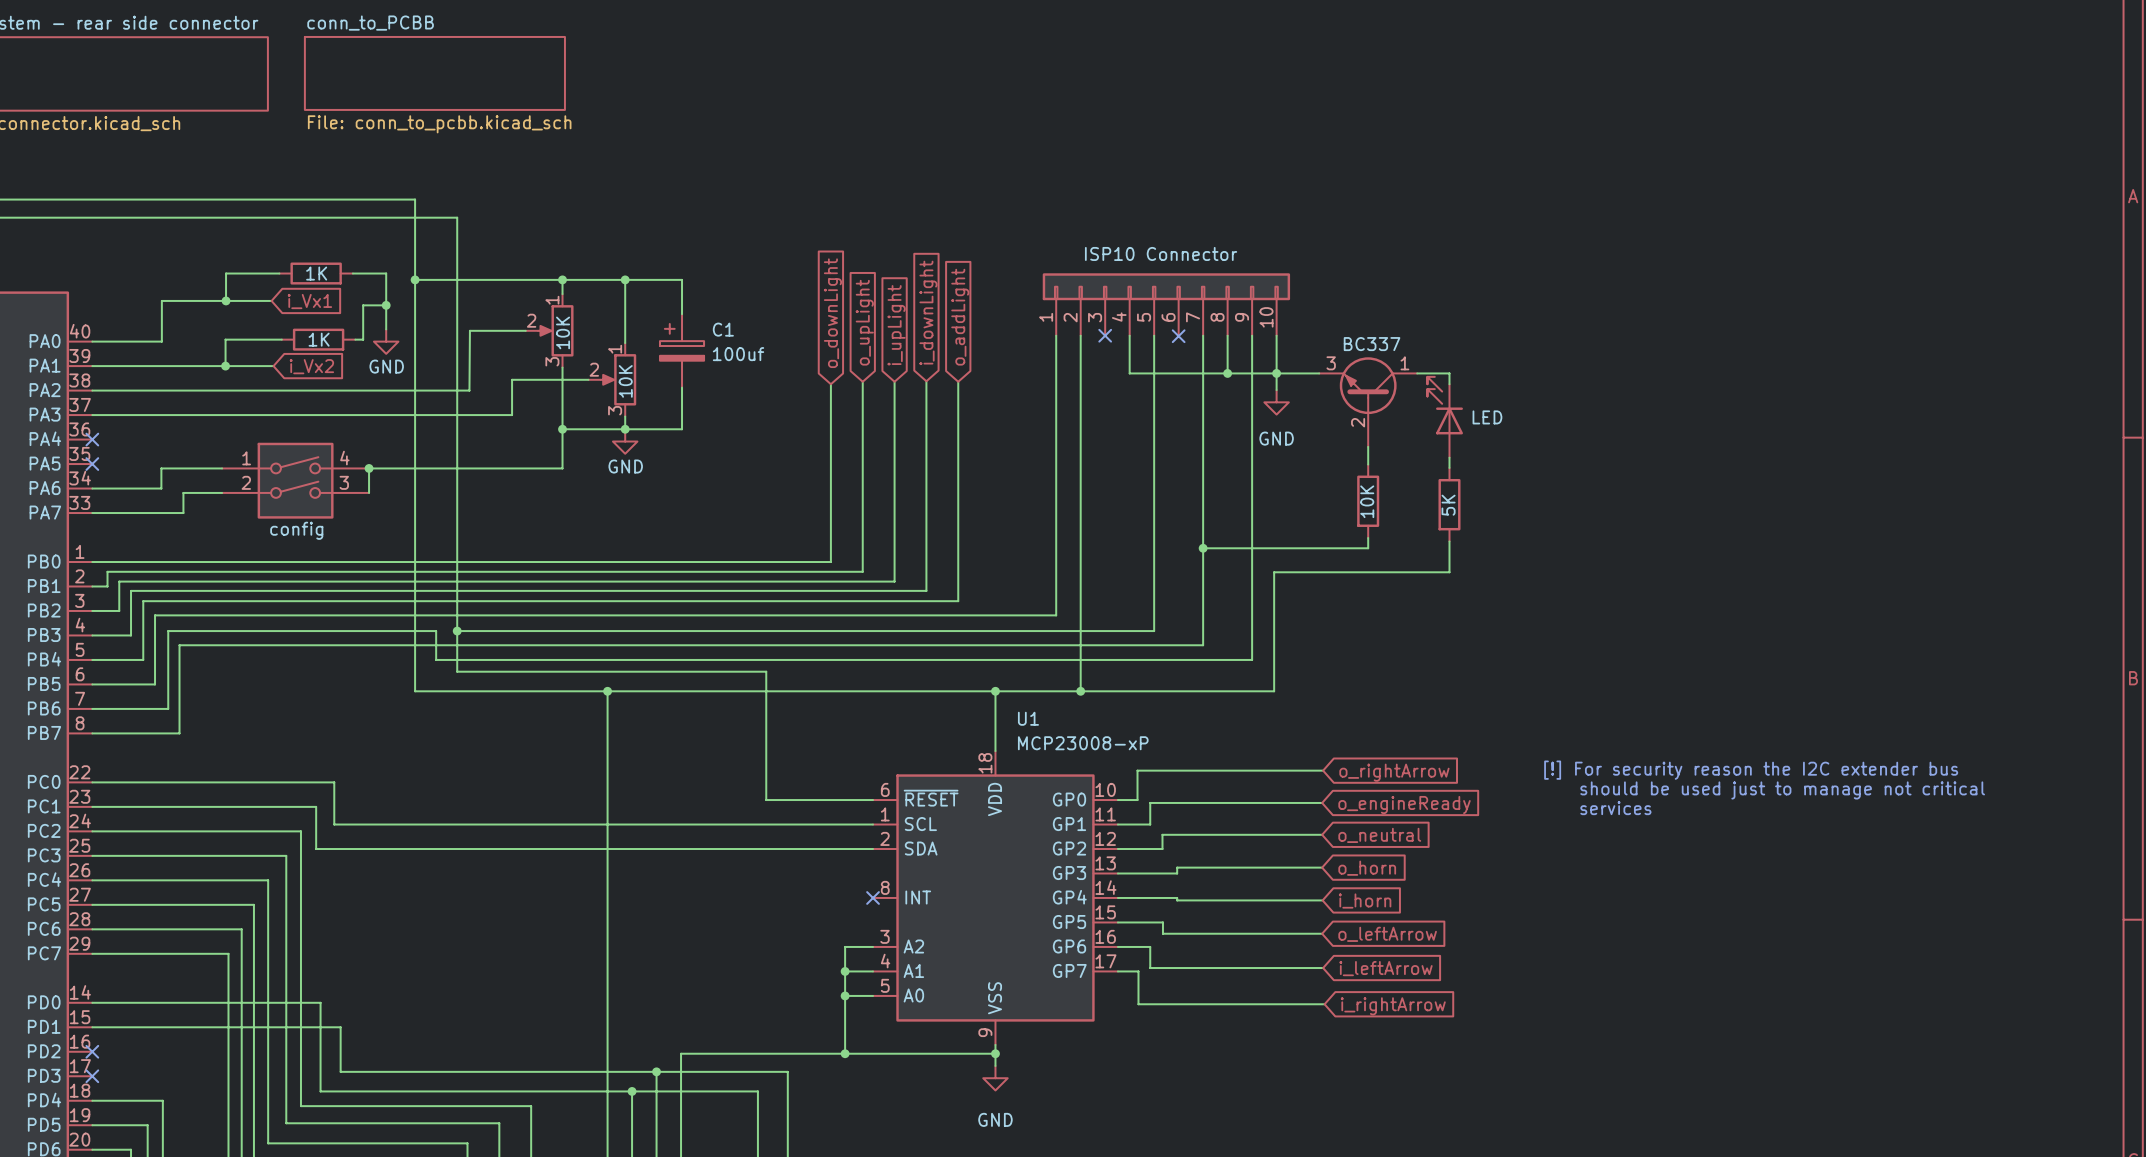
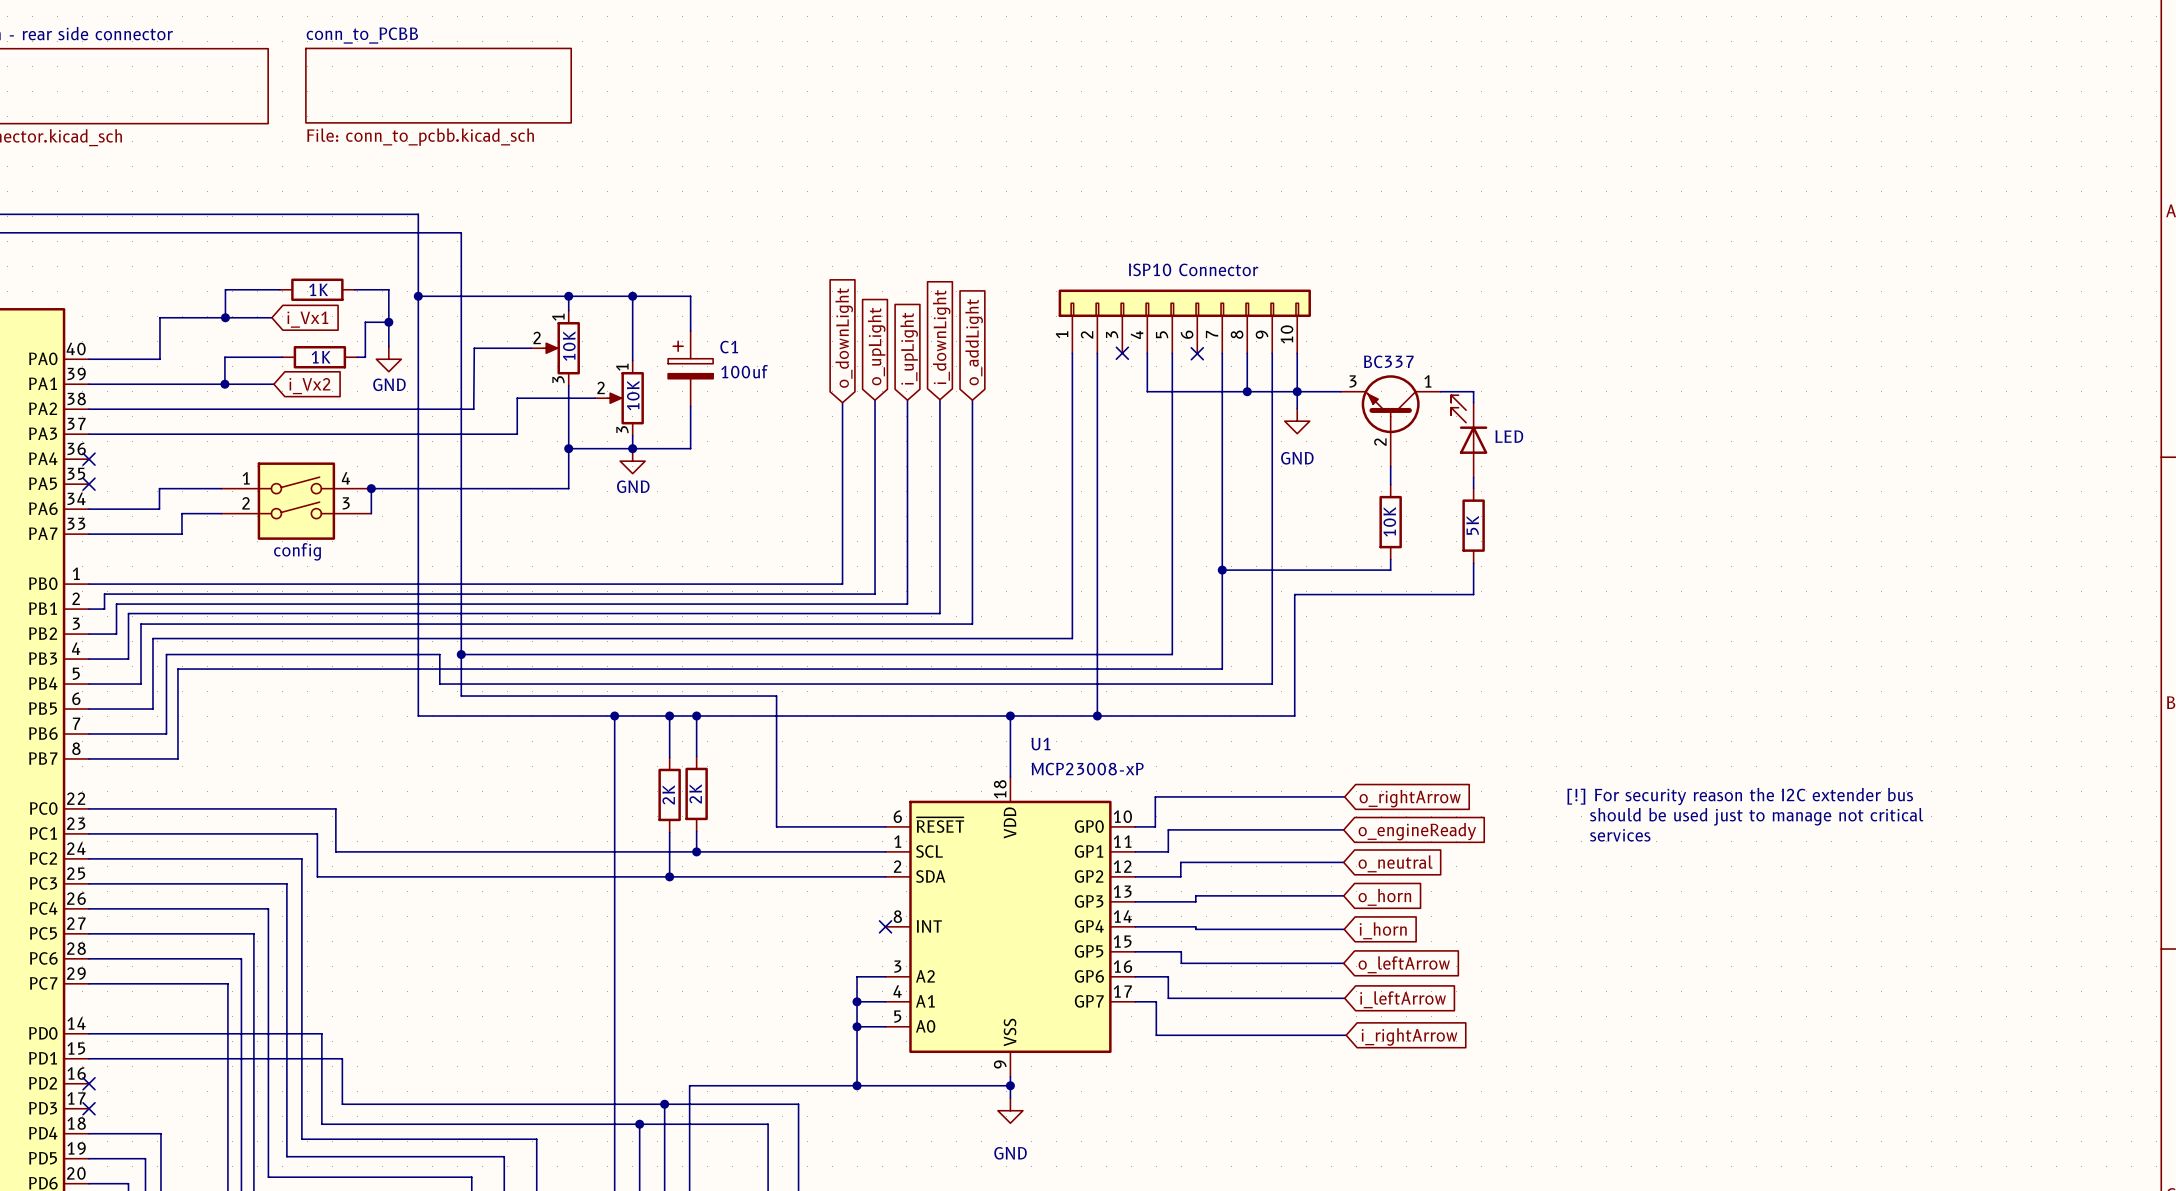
wire: none -> (669, 716) (669, 757)
junction: none -> (669, 716)
wire: none -> (696, 716) (696, 756)
junction: none -> (696, 716)
part: none -> 2K (696, 793)
part: none -> 2K (669, 794)
wire: none -> (696, 831) (696, 851)
wire: none -> (669, 832) (669, 876)
junction: none -> (696, 851)
junction: none -> (669, 876)

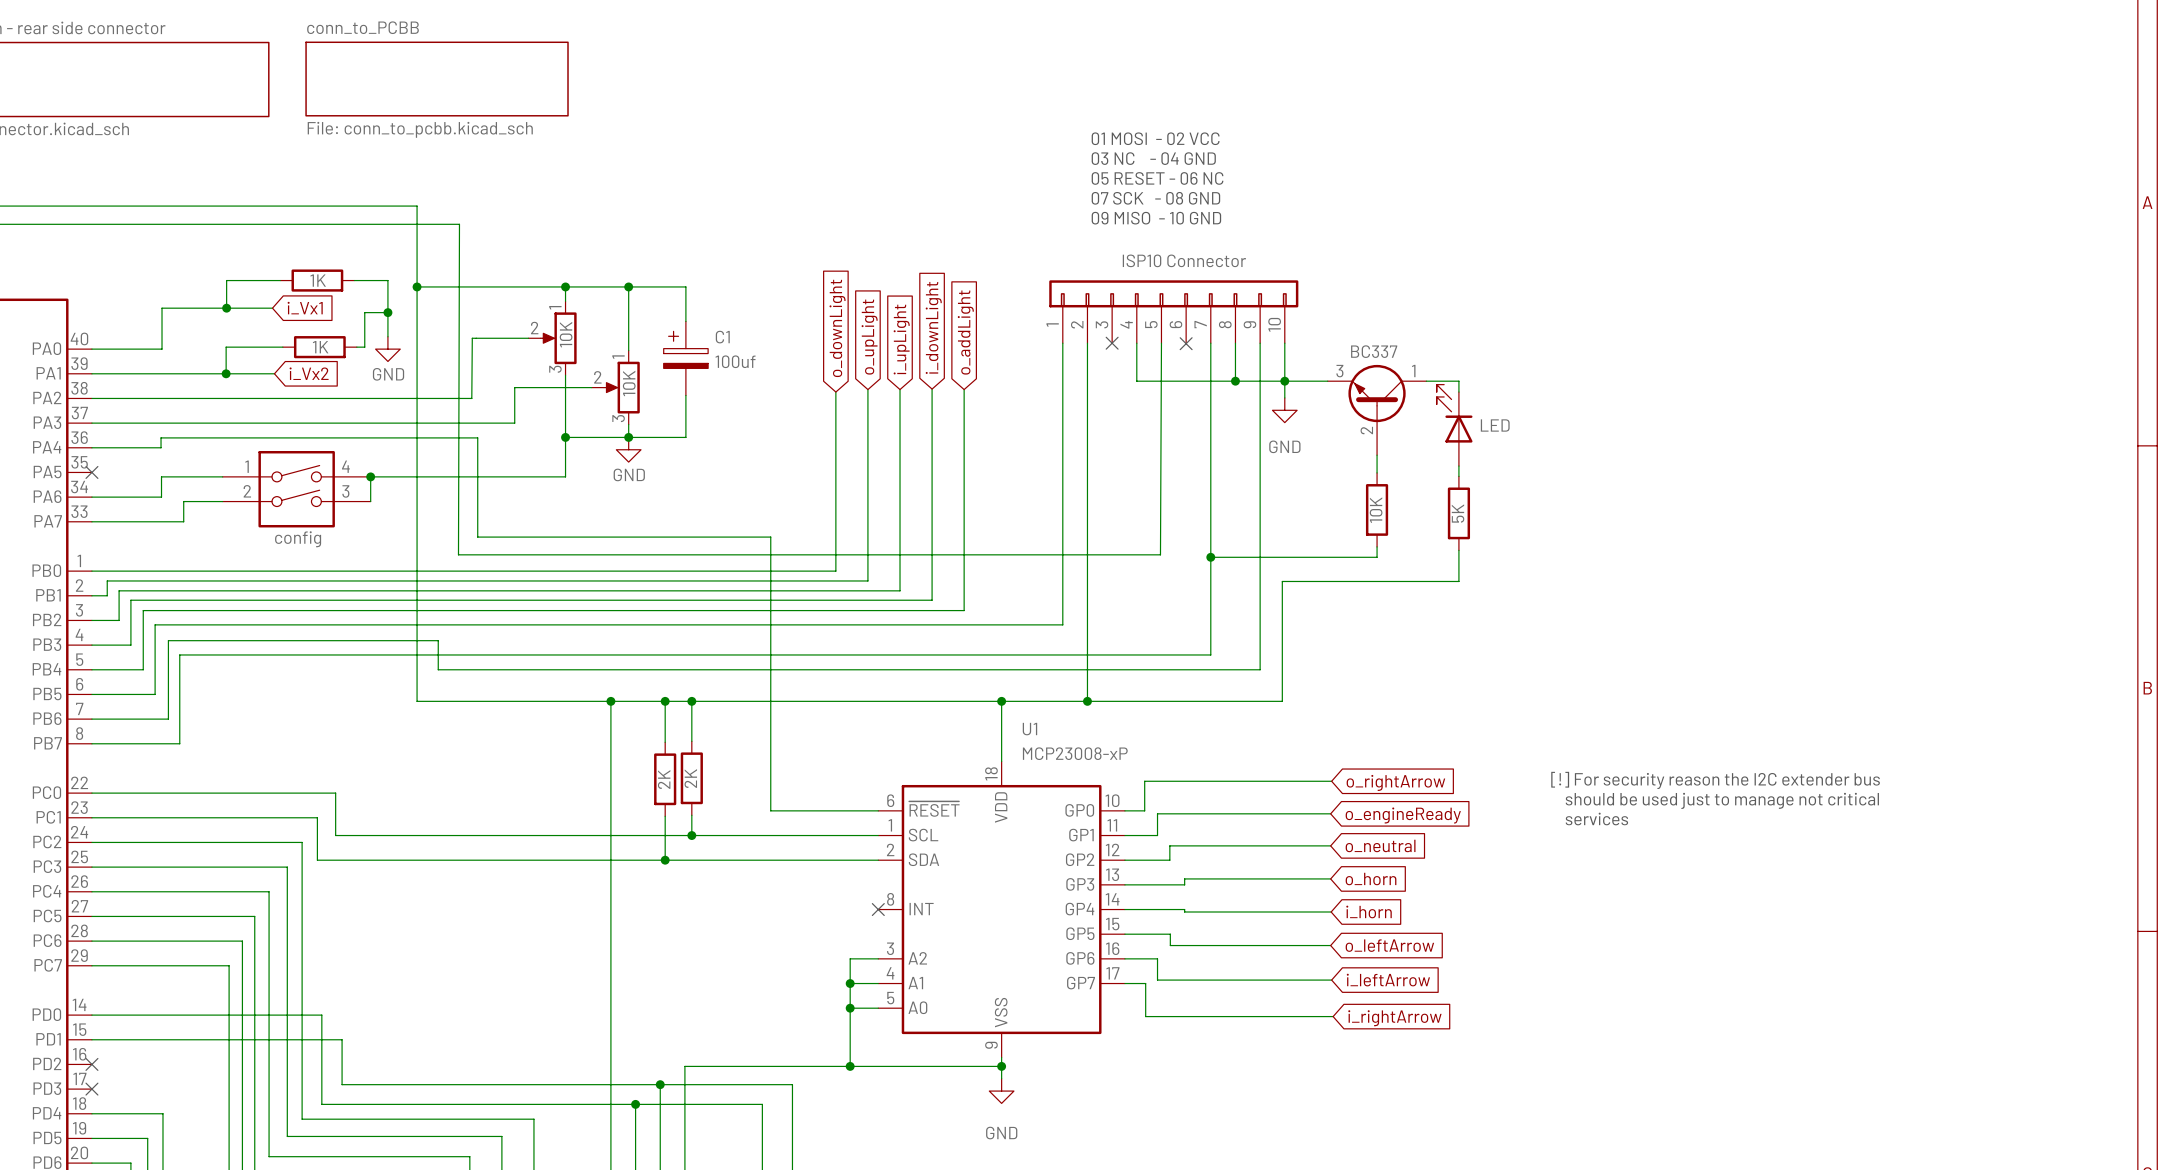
text: none -> 01 MOSI - 02 VCC (1155, 138)
text: none -> 03 NC - 04 GND (1153, 158)
text: none -> 05 RESET - 06 NC (1157, 178)
text: none -> 07 SCK - 08 GND (1155, 198)
text: none -> 09 MISO - 10 GND (1156, 218)
wire: (461, 232) (461, 696) (776, 696) -> (91, 447) (161, 447) (161, 437) (477, 437) (477, 537) (770, 537) (770, 681)
wire: (1172, 353) (1172, 654) (461, 654) -> (1161, 343) (1160, 554) (458, 554) (459, 224)
no-connect mark: (89, 459) -> none
junction: (461, 654) -> none

